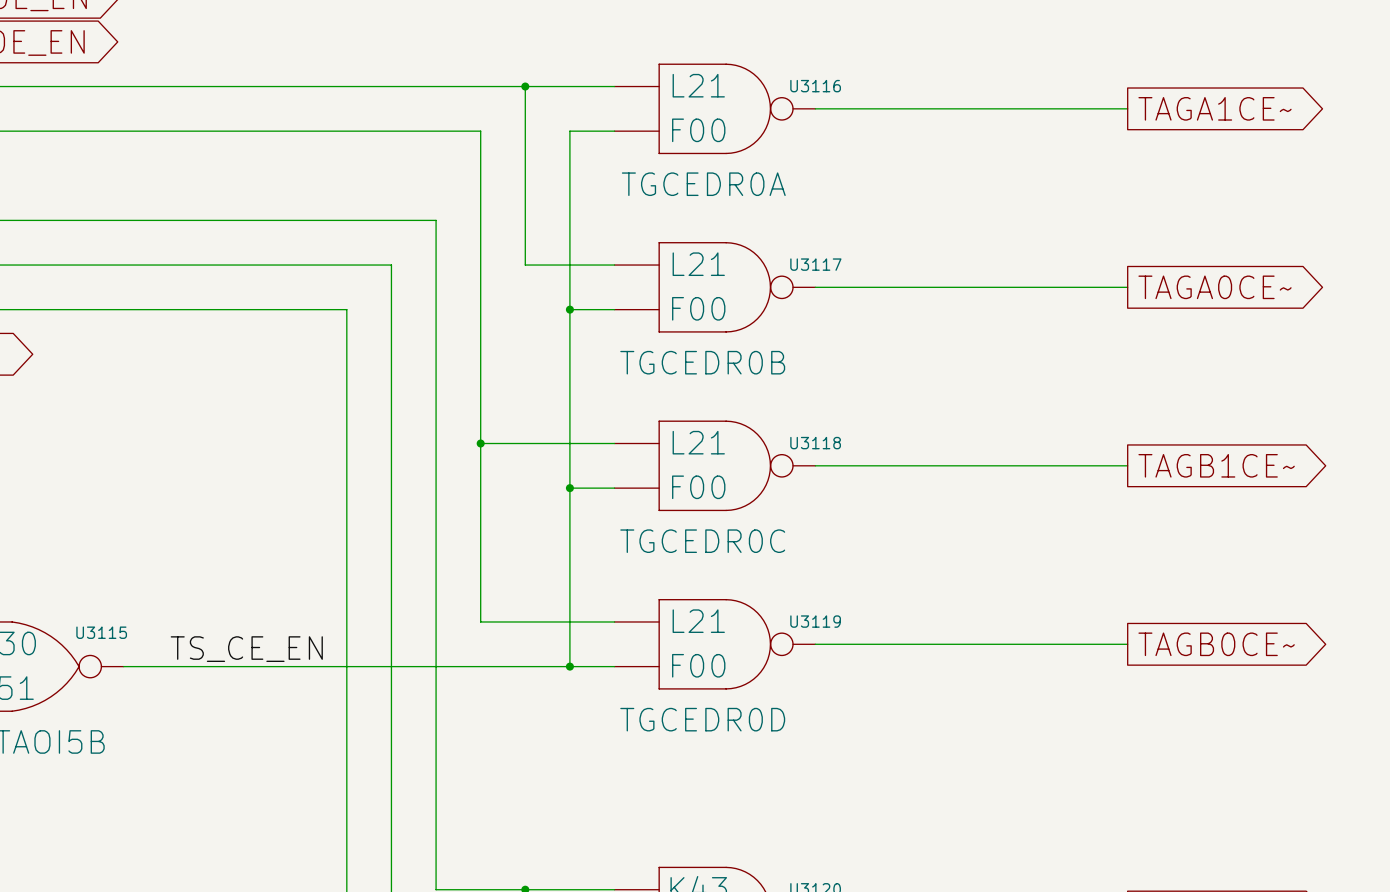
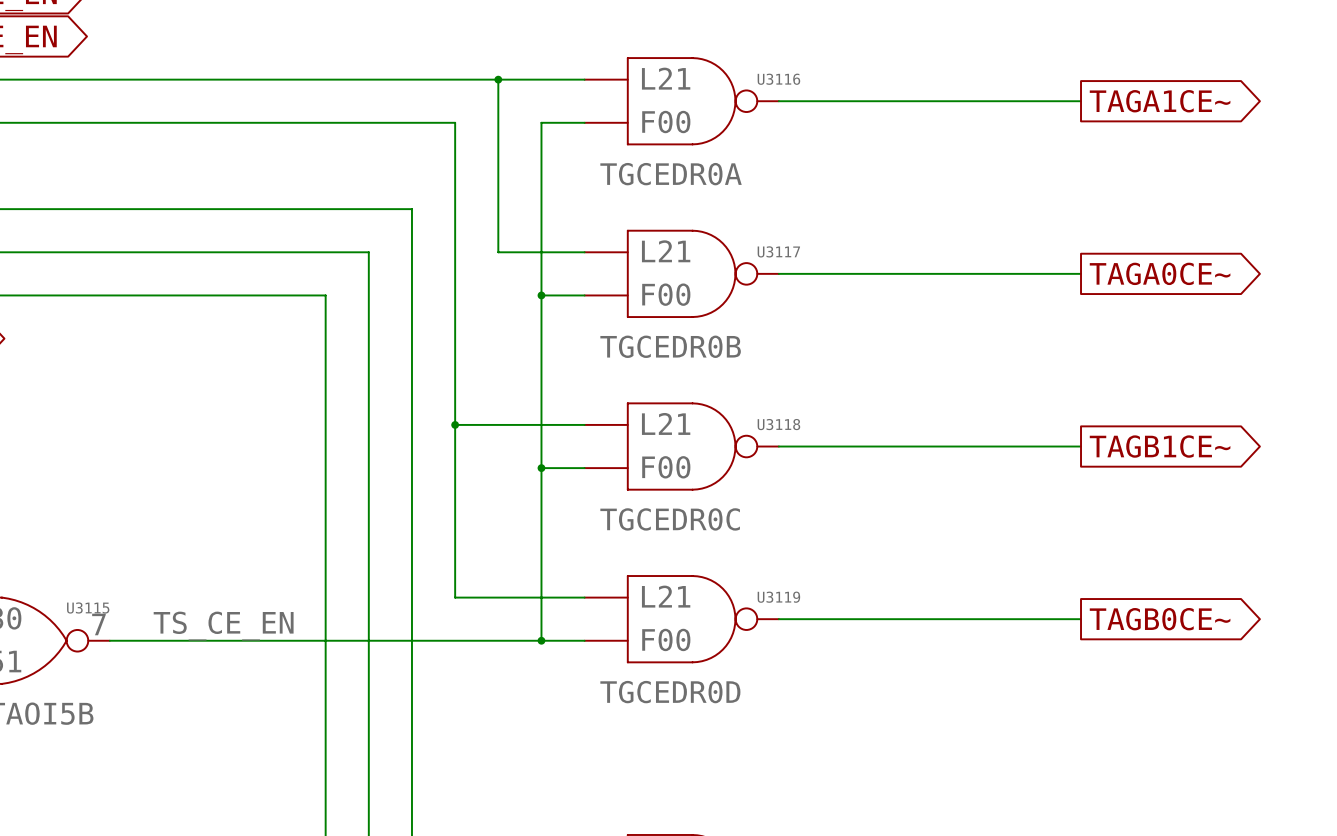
U3115 pin number: none -> 7 (98, 624)

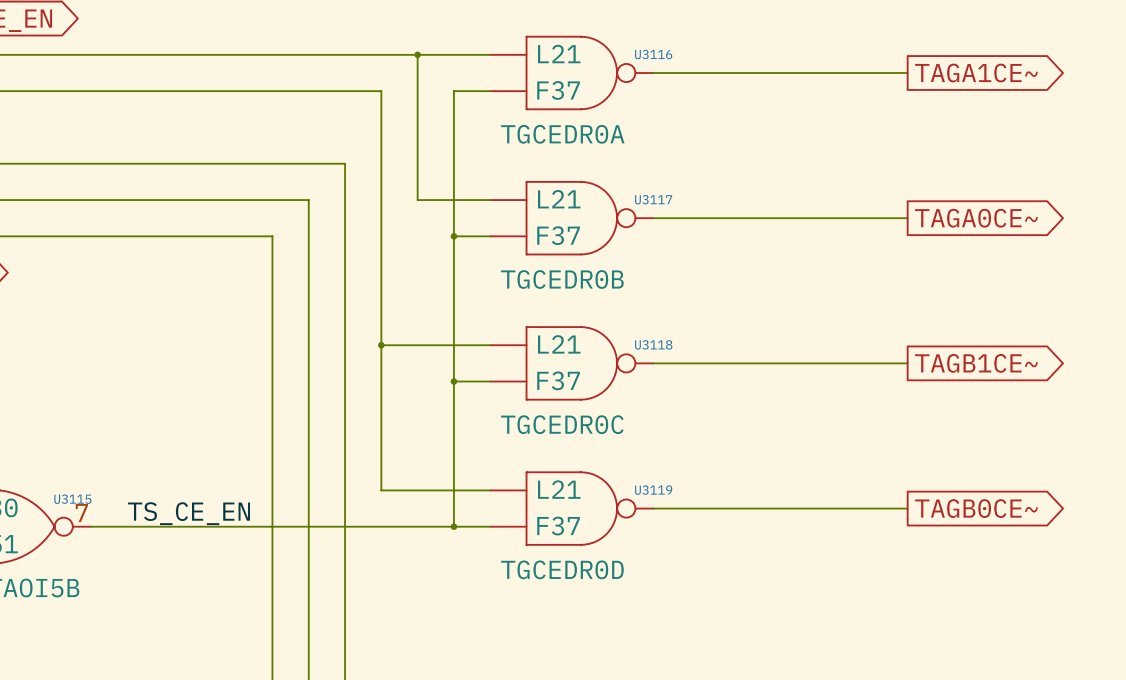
U3116 value: F00 (666, 122) -> F37 (558, 90)
U3117 value: F00 (666, 294) -> F37 (558, 235)
U3118 value: F00 (666, 467) -> F37 (558, 380)
U3119 value: F00 (666, 639) -> F37 (558, 526)

